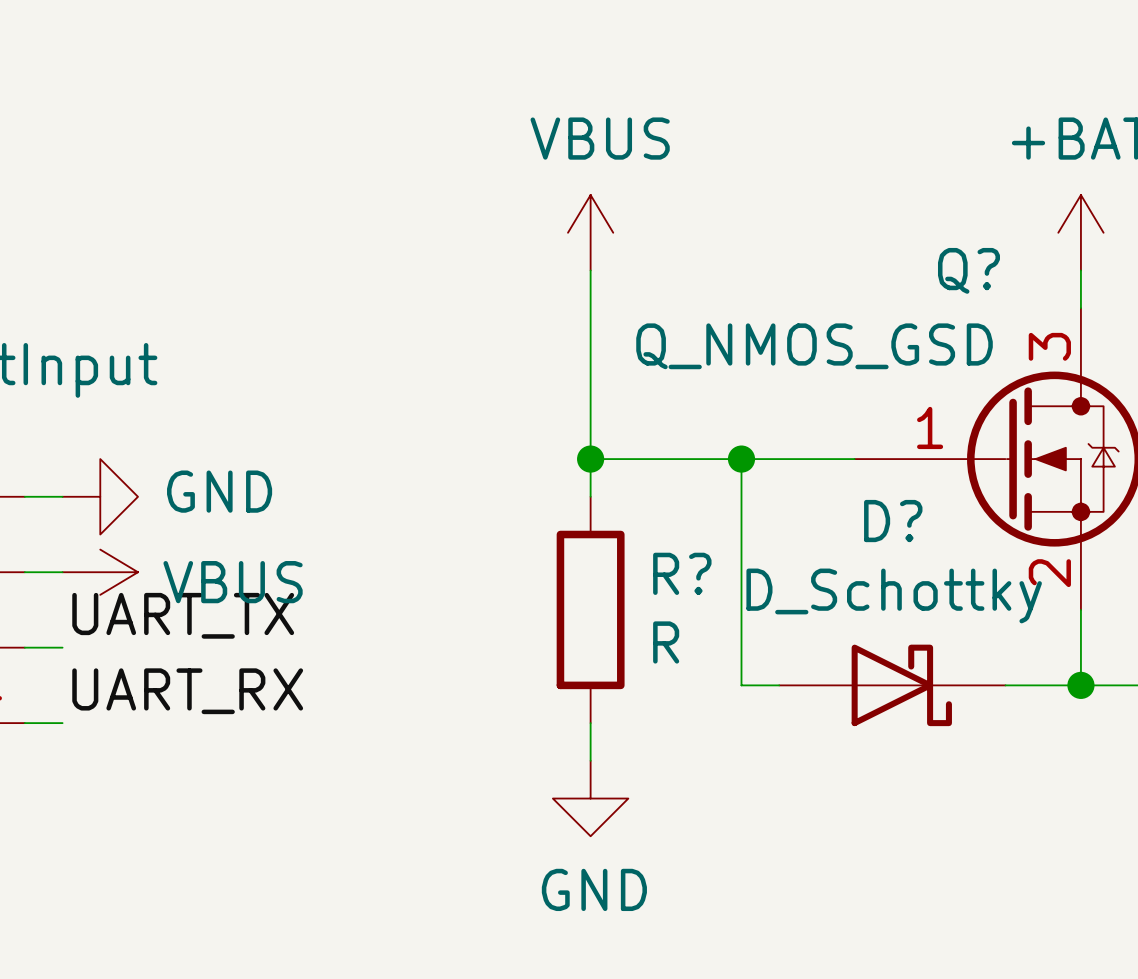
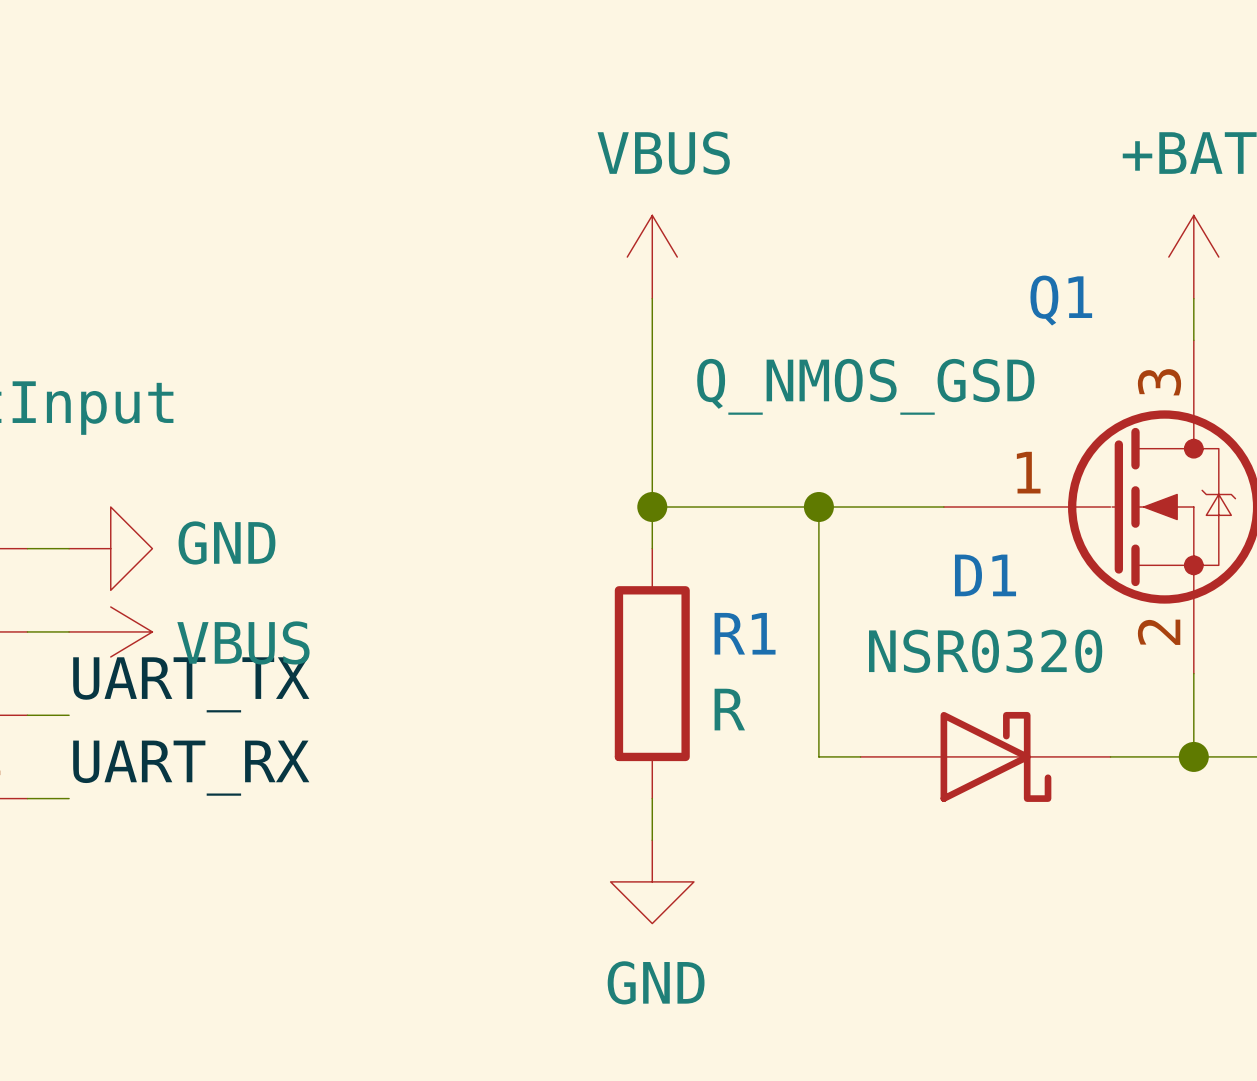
Q? name: Q? (968, 270) -> Q1 (1061, 300)
D? name: D? (893, 521) -> D1 (985, 575)
R? name: R? (682, 573) -> R1 (745, 633)
D? value: D_Schottky (894, 595) -> NSR0320 (985, 651)

